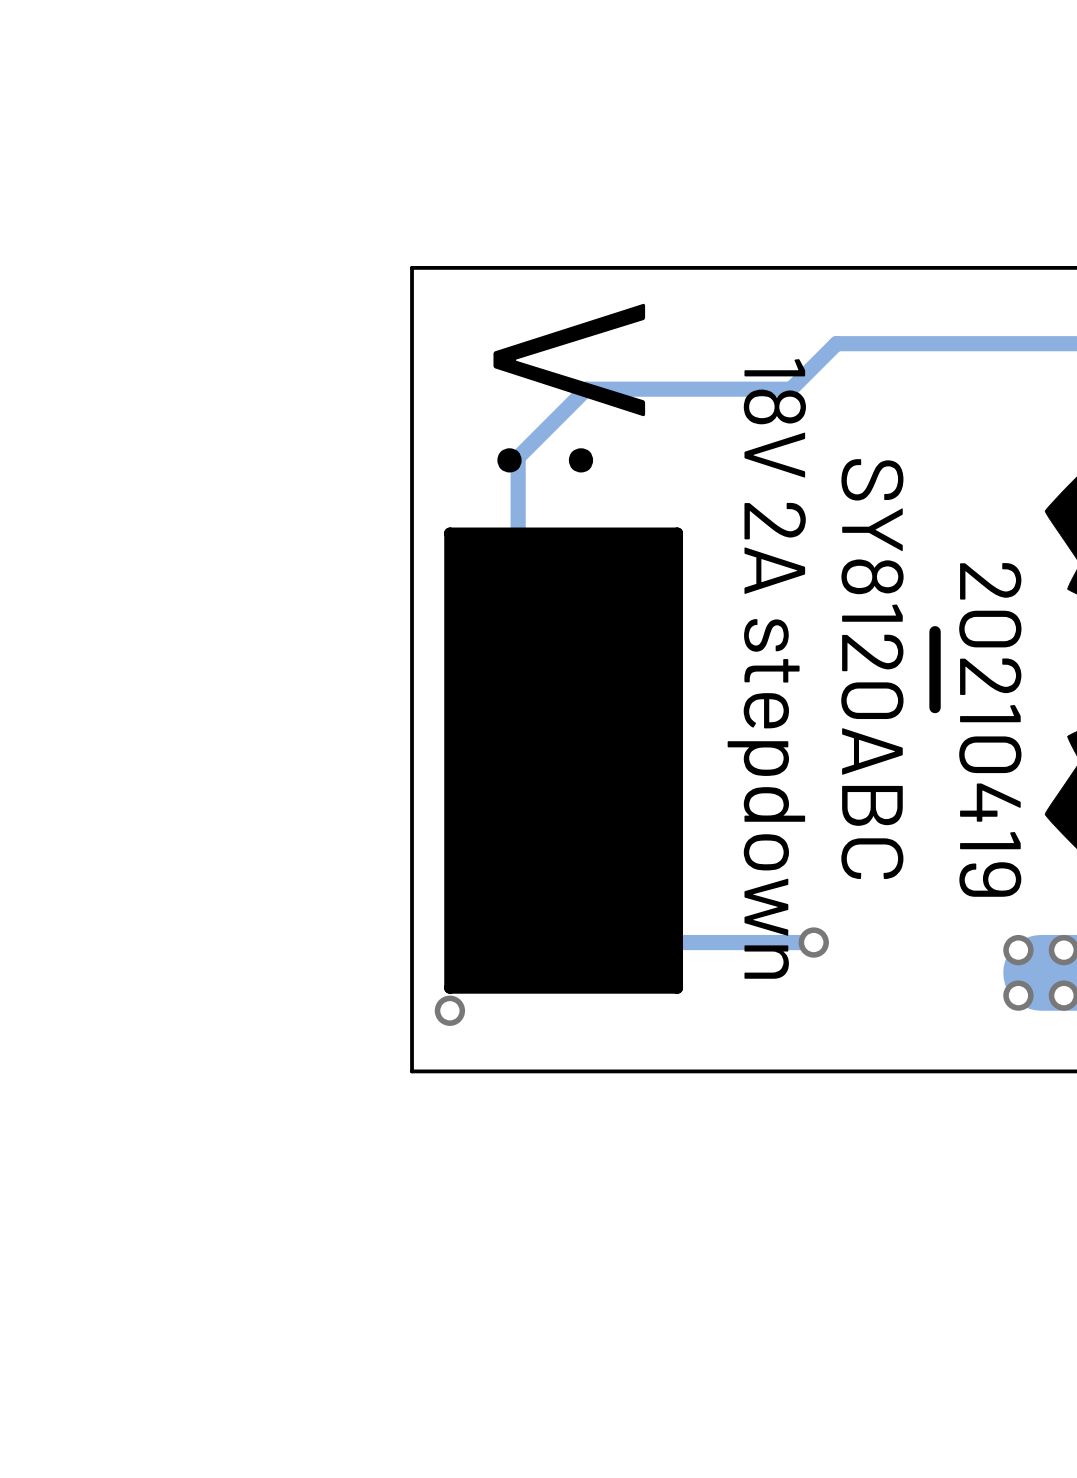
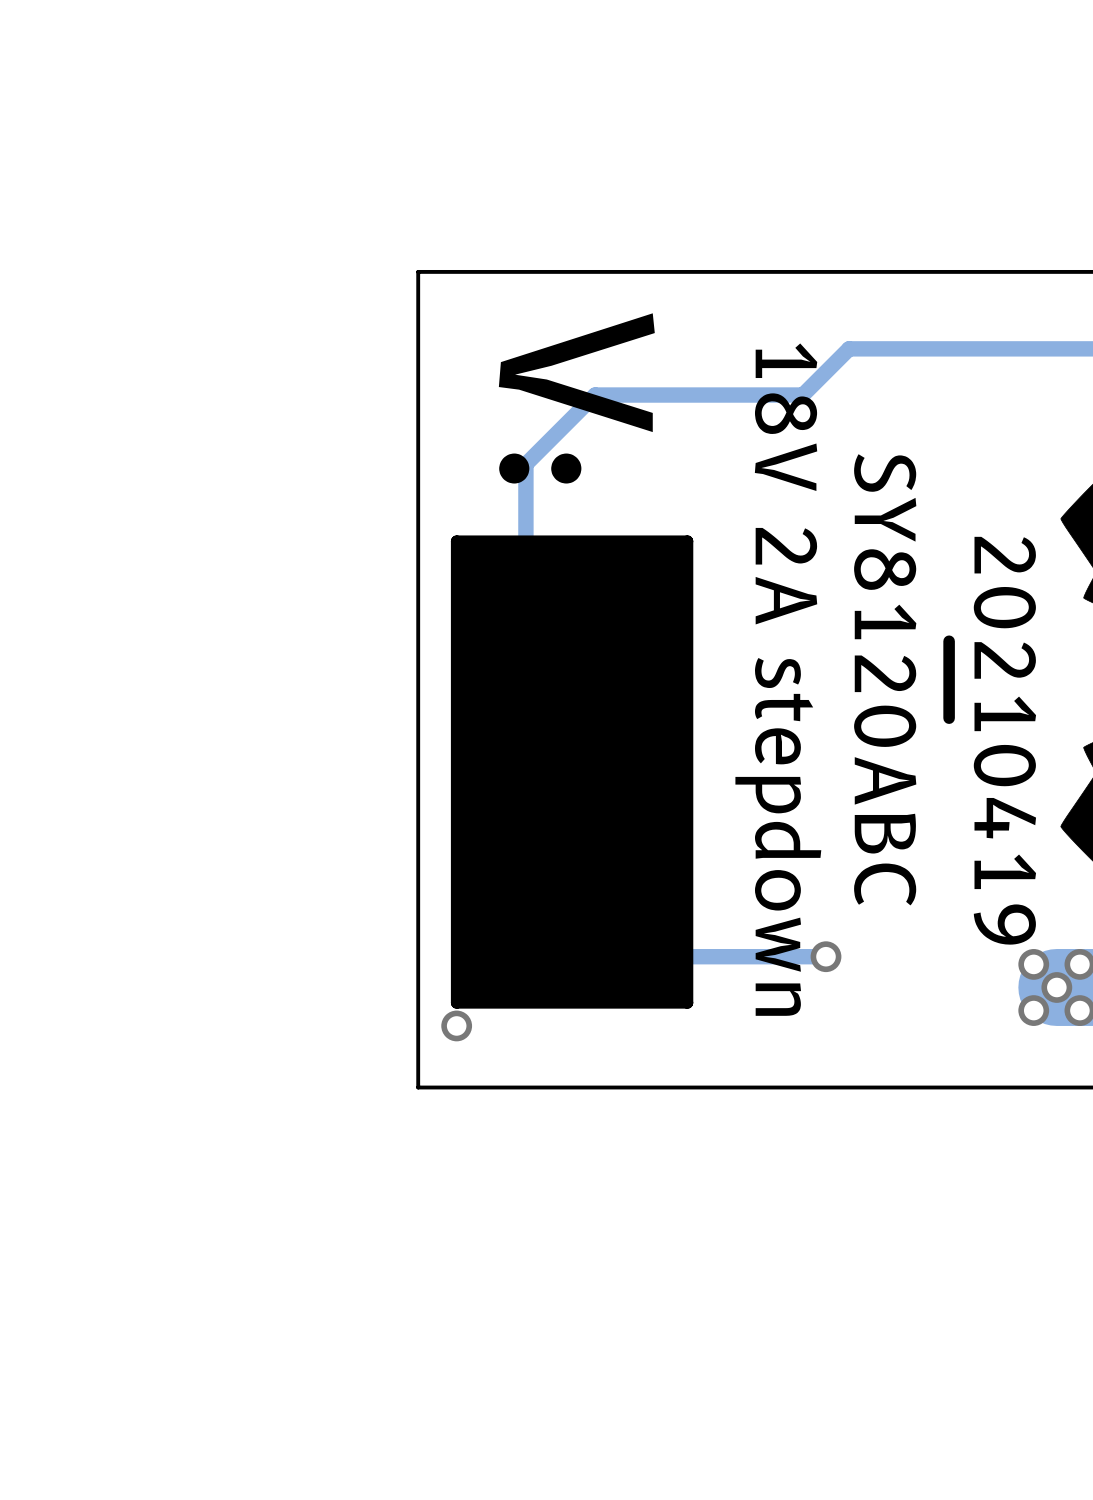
via: none -> (1056, 987)

